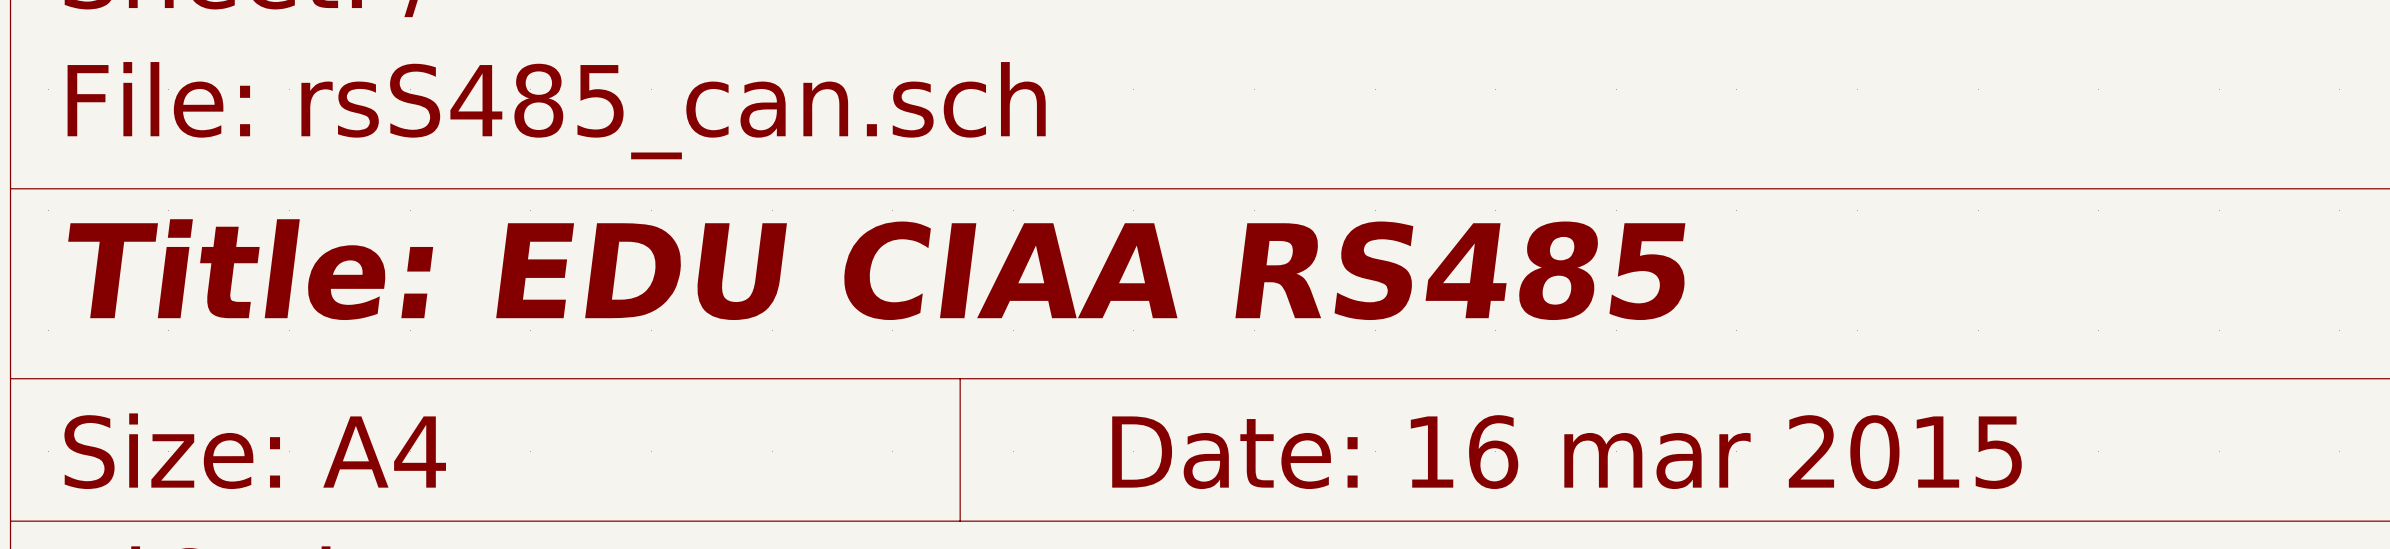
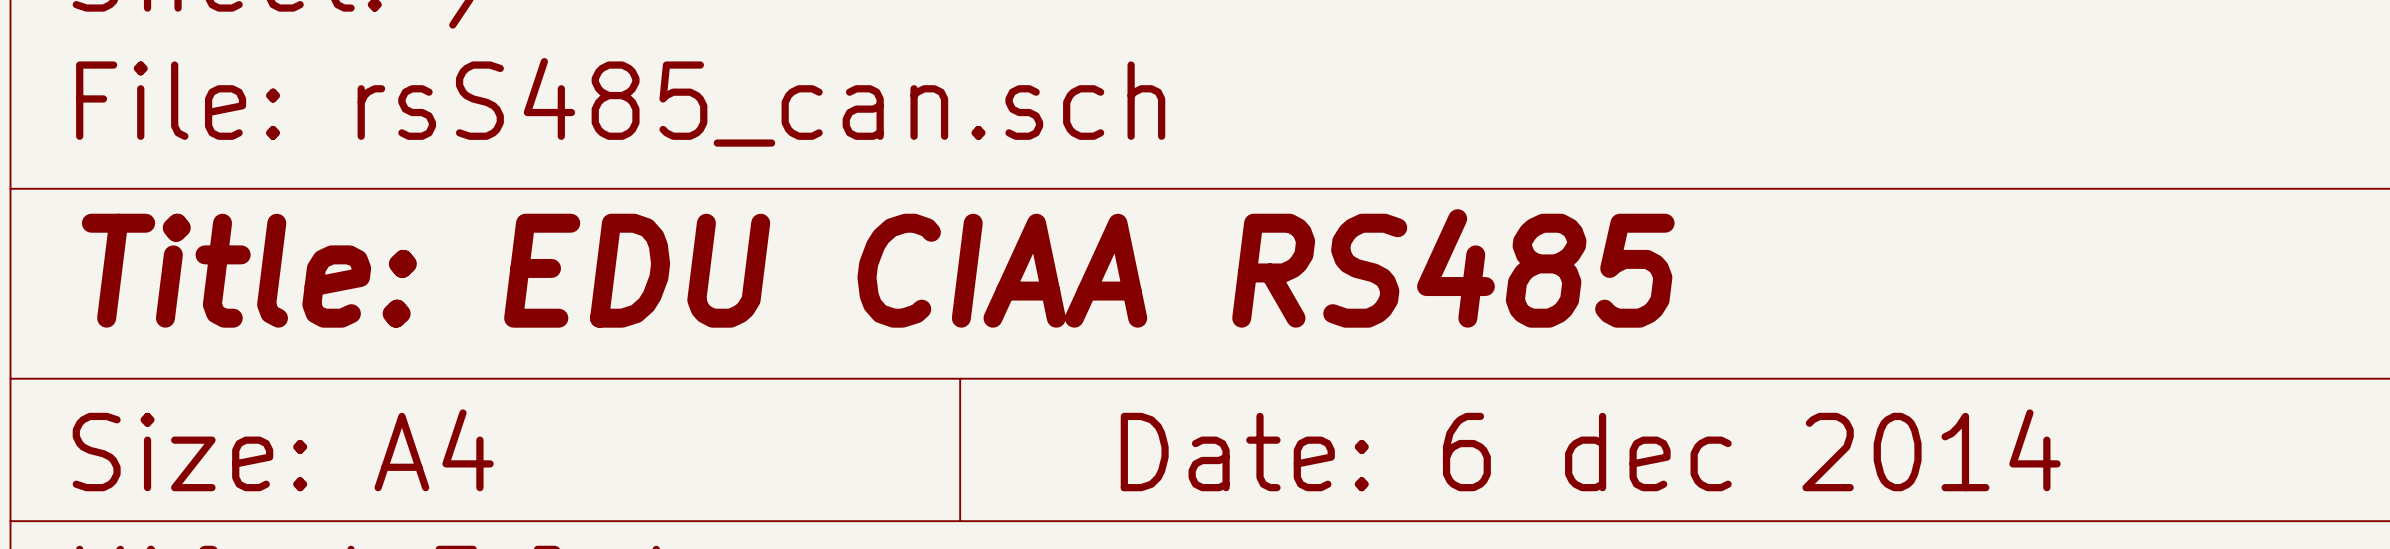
title block: Date: 16 mar 2015 (1567, 452) -> Date: 6 dec 2014 (1590, 450)

